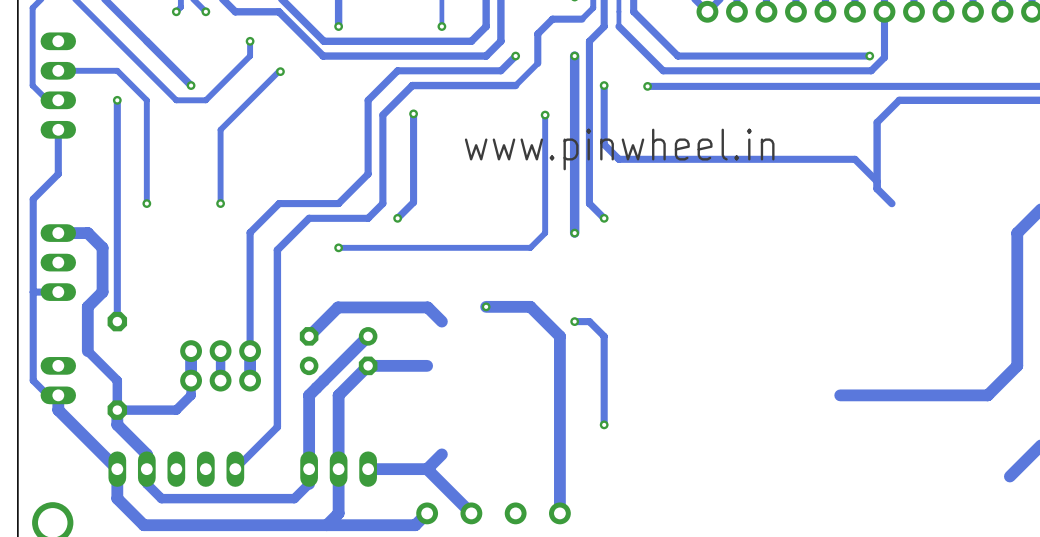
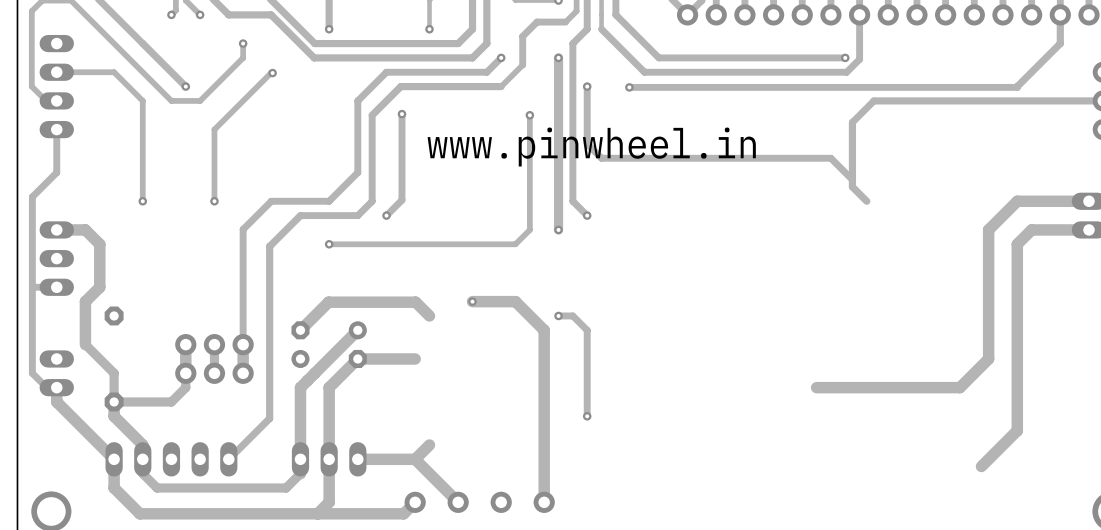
track: (117, 100) (117, 321) -> none
via: (117, 100) -> none

